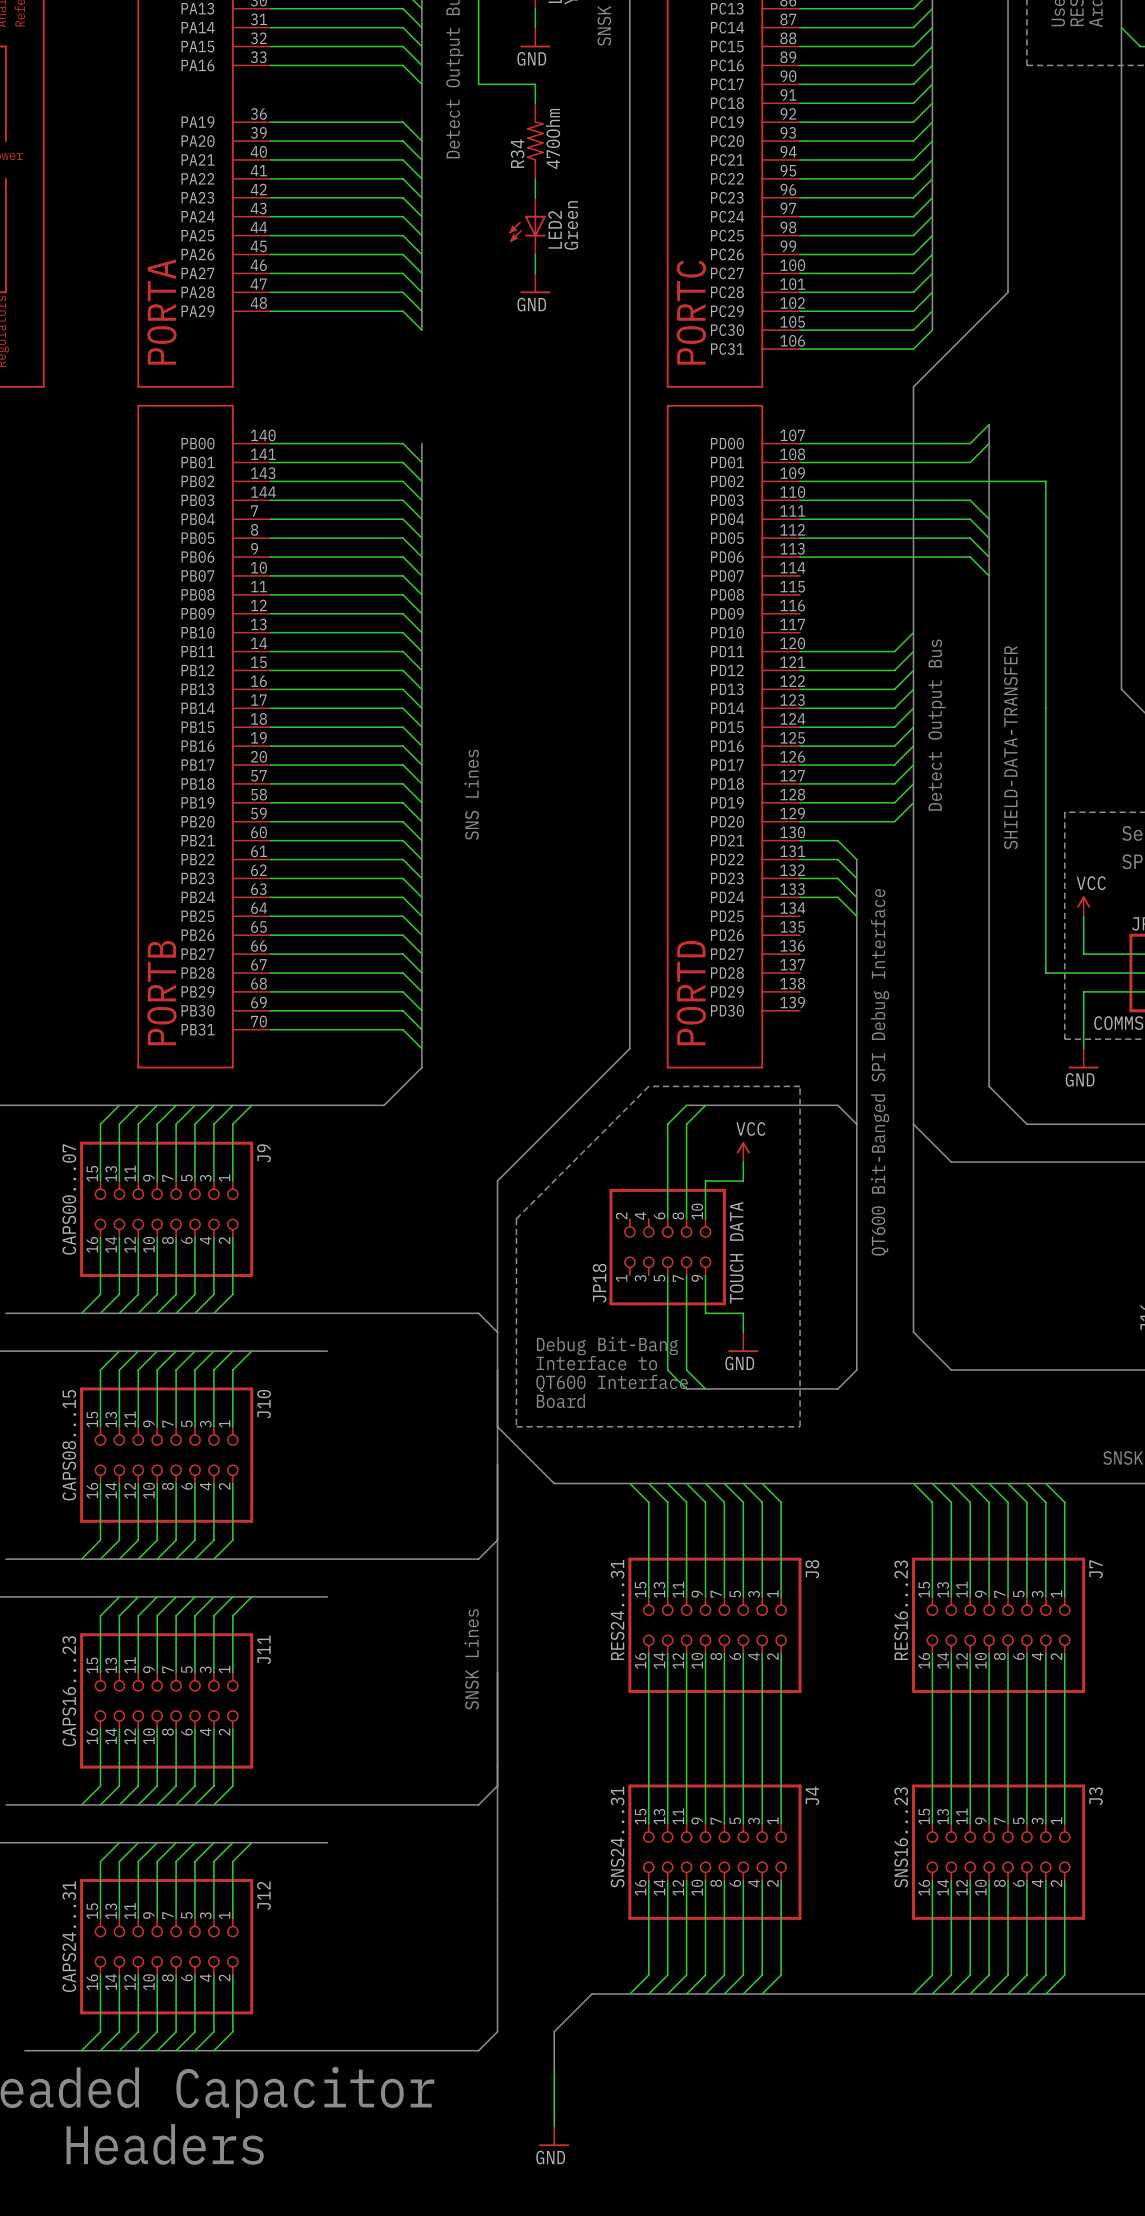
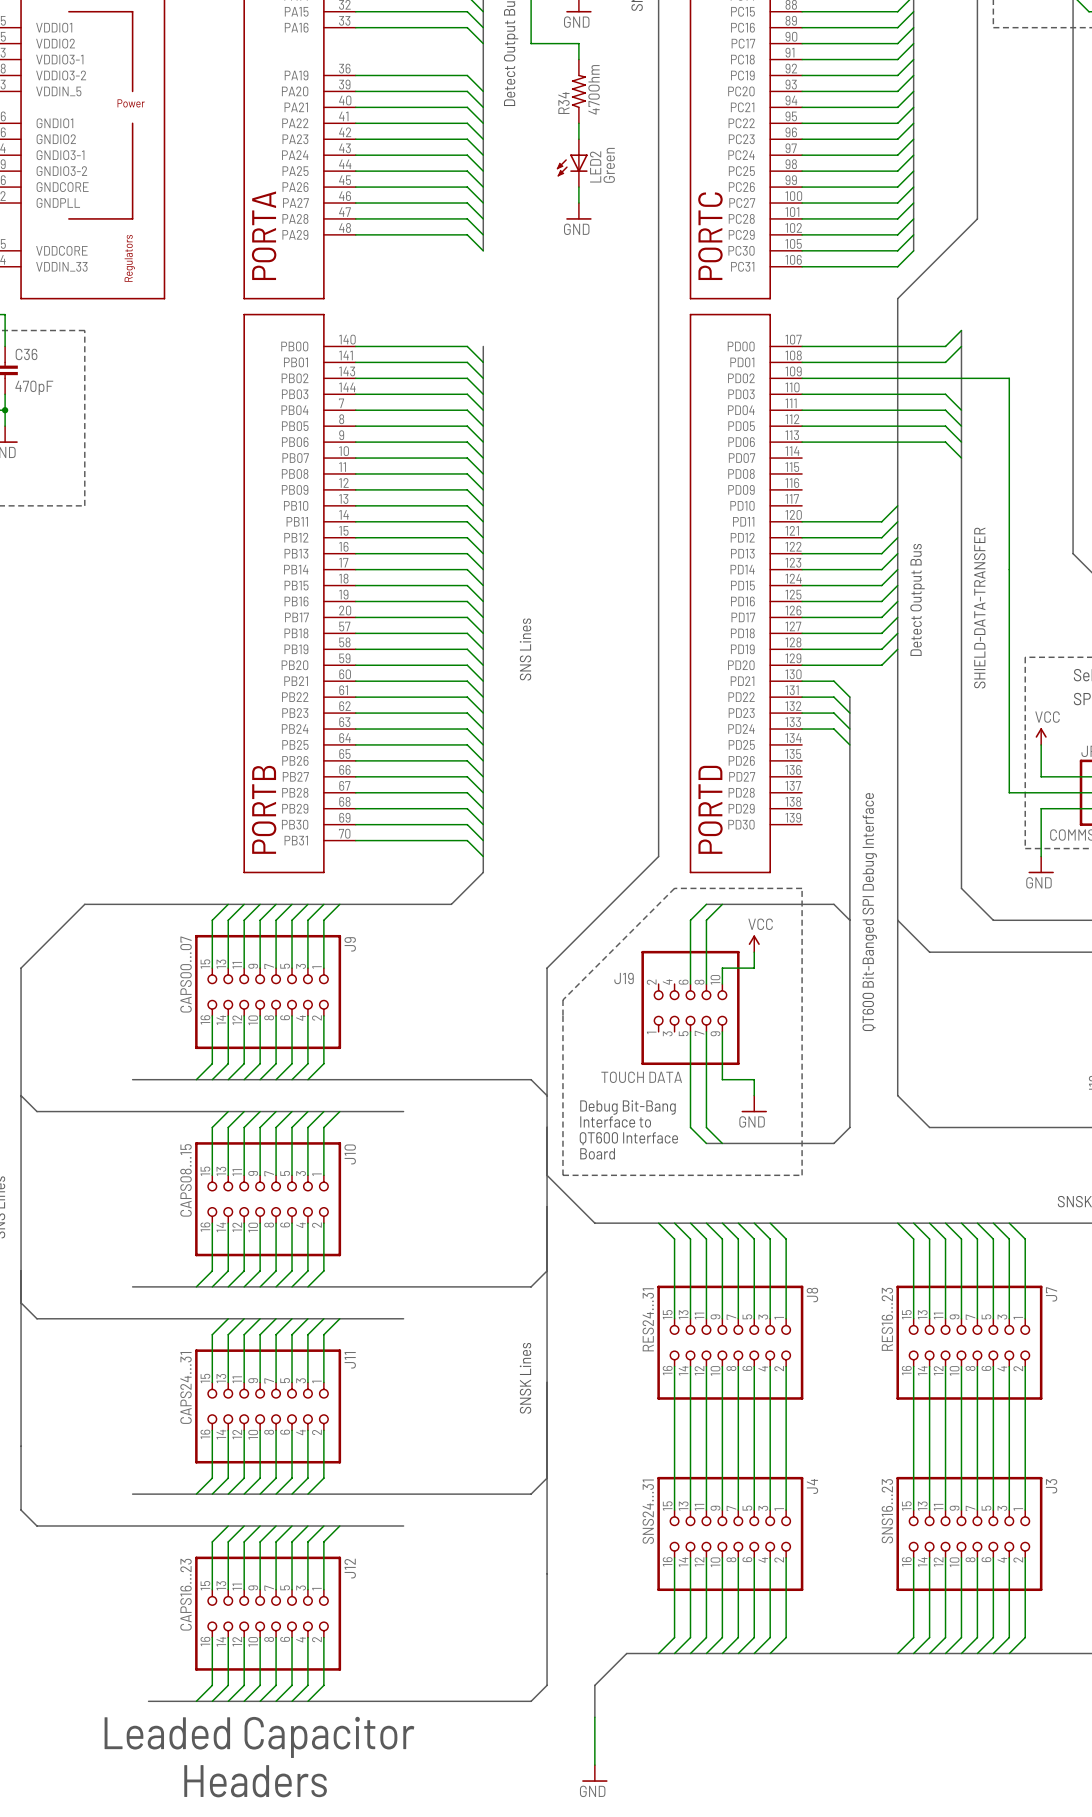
J19: none -> TOUCH DATA (690, 1007)
JP18: TOUCH DATA (667, 1247) -> none
J11 value: CAPS16...23 (69, 1691) -> CAPS24...31 (186, 1387)
J12 value: CAPS24...31 (69, 1936) -> CAPS16...23 (186, 1594)

